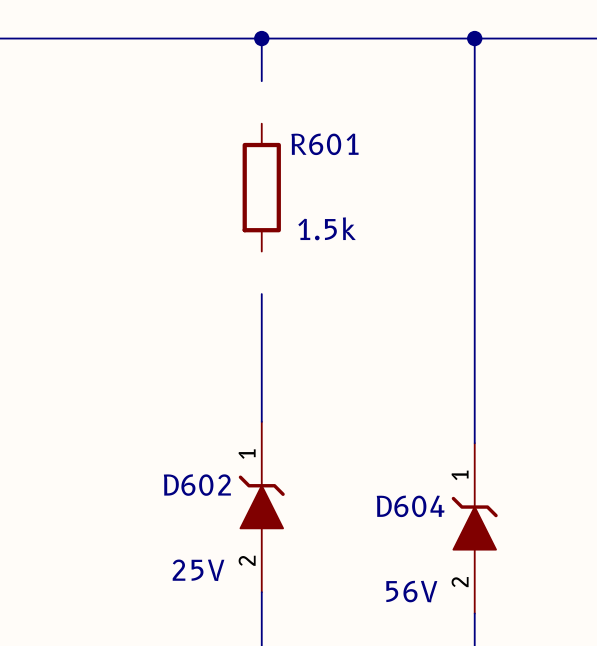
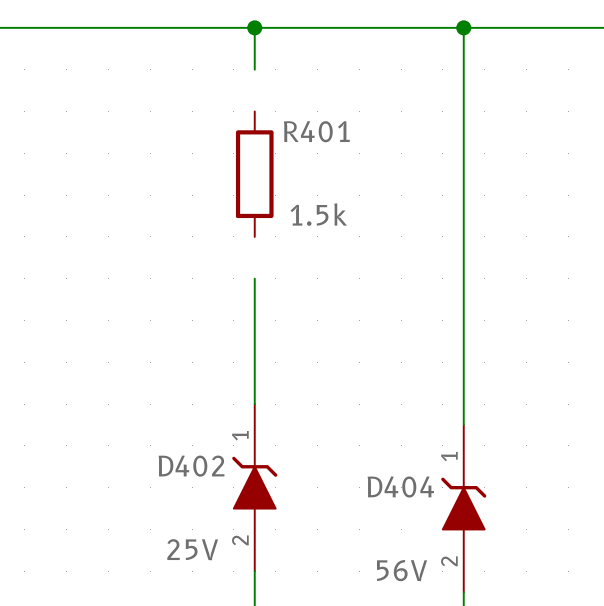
R601 name: R601 (324, 144) -> R401 (316, 131)
D602 name: D602 (197, 485) -> D402 (191, 466)
D604 name: D604 (410, 506) -> D404 (400, 487)

